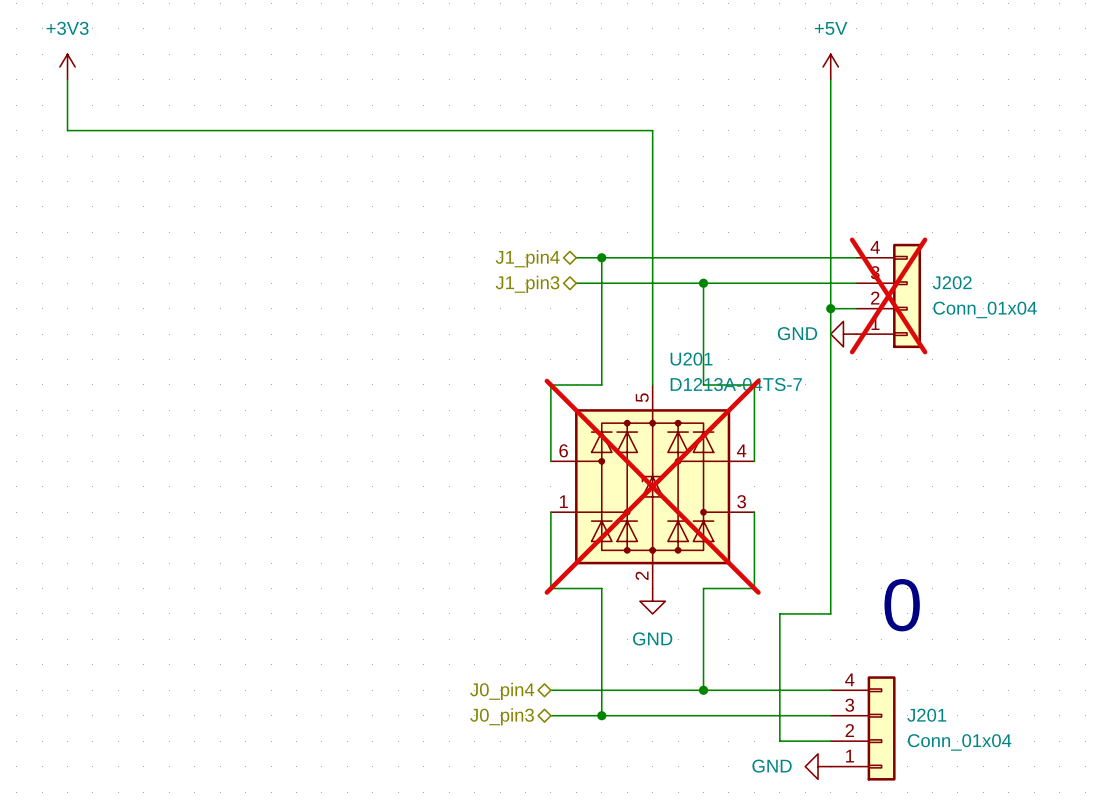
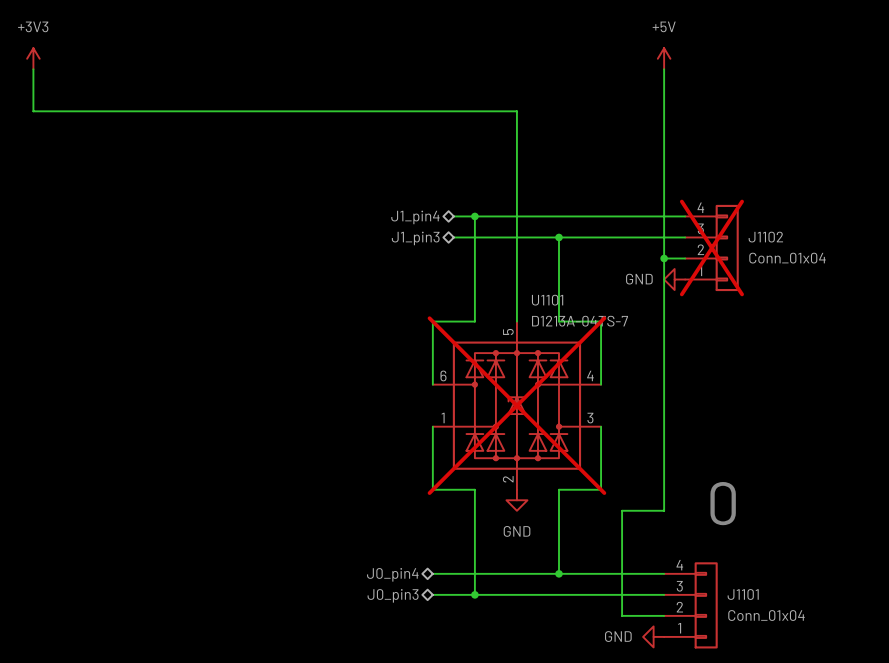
J202 name: J202 (952, 282) -> J1102 (765, 237)
U201 name: U201 (691, 359) -> U1101 (547, 300)
J201 name: J201 (926, 715) -> J1101 (743, 594)

